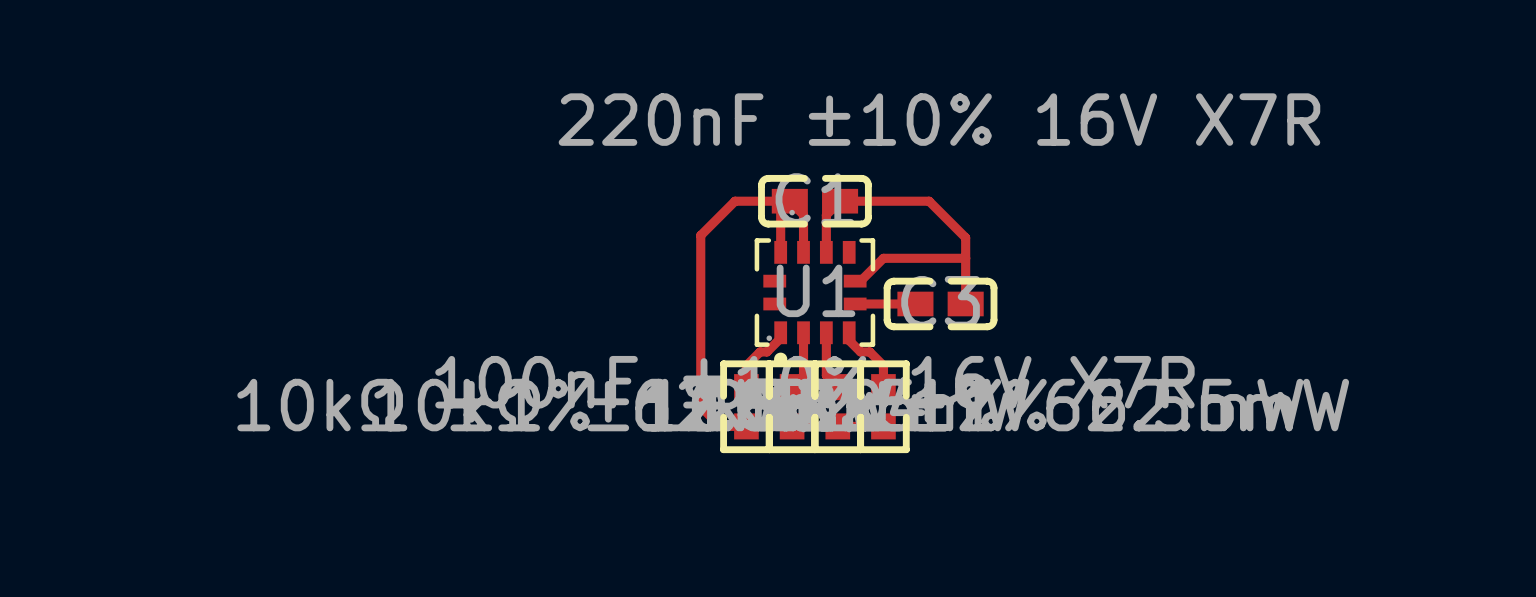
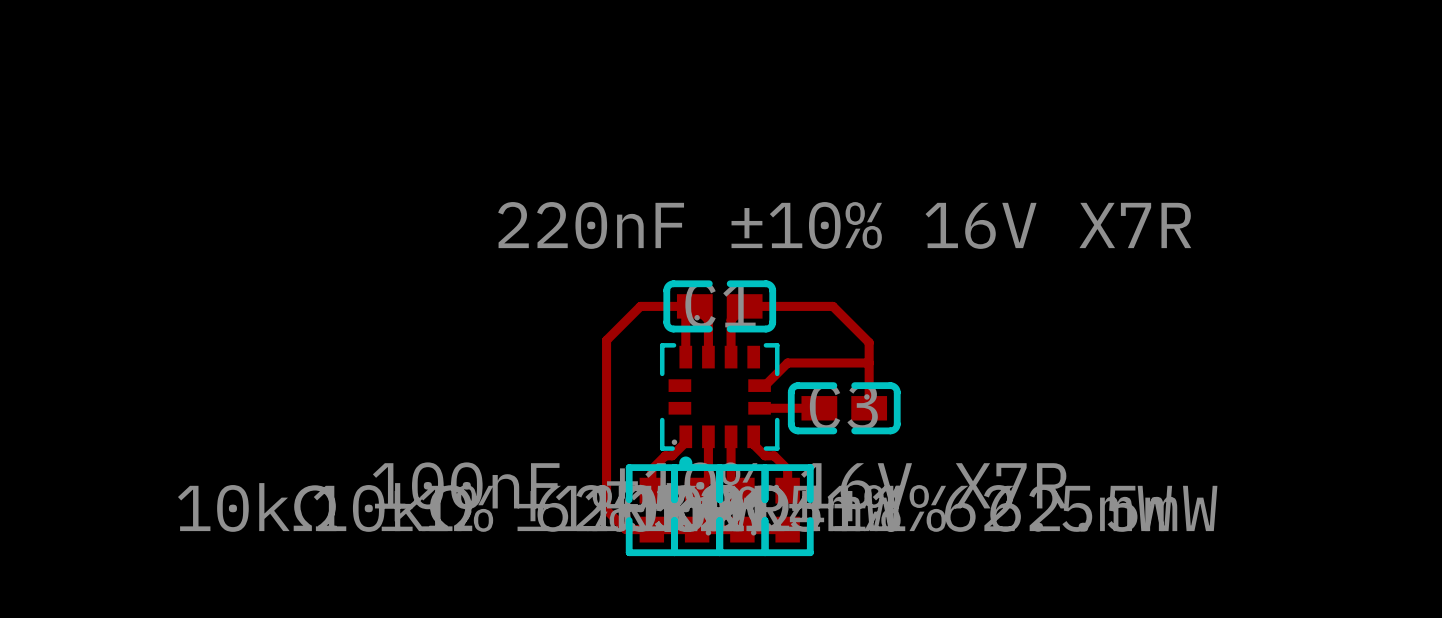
U1 name: U1 (816, 290) -> none

